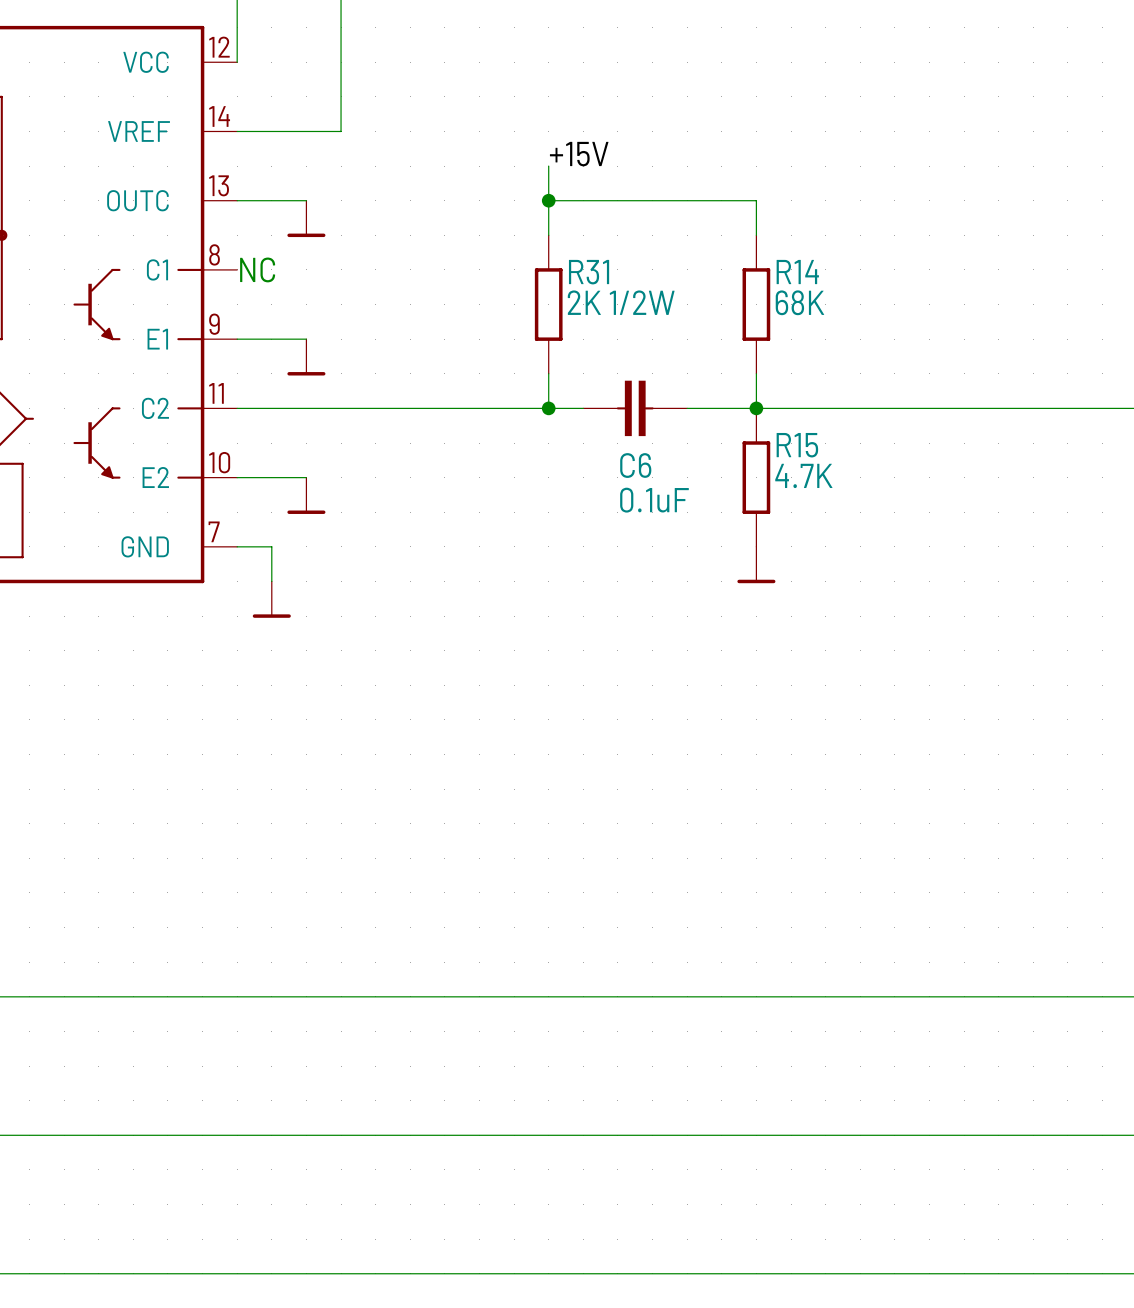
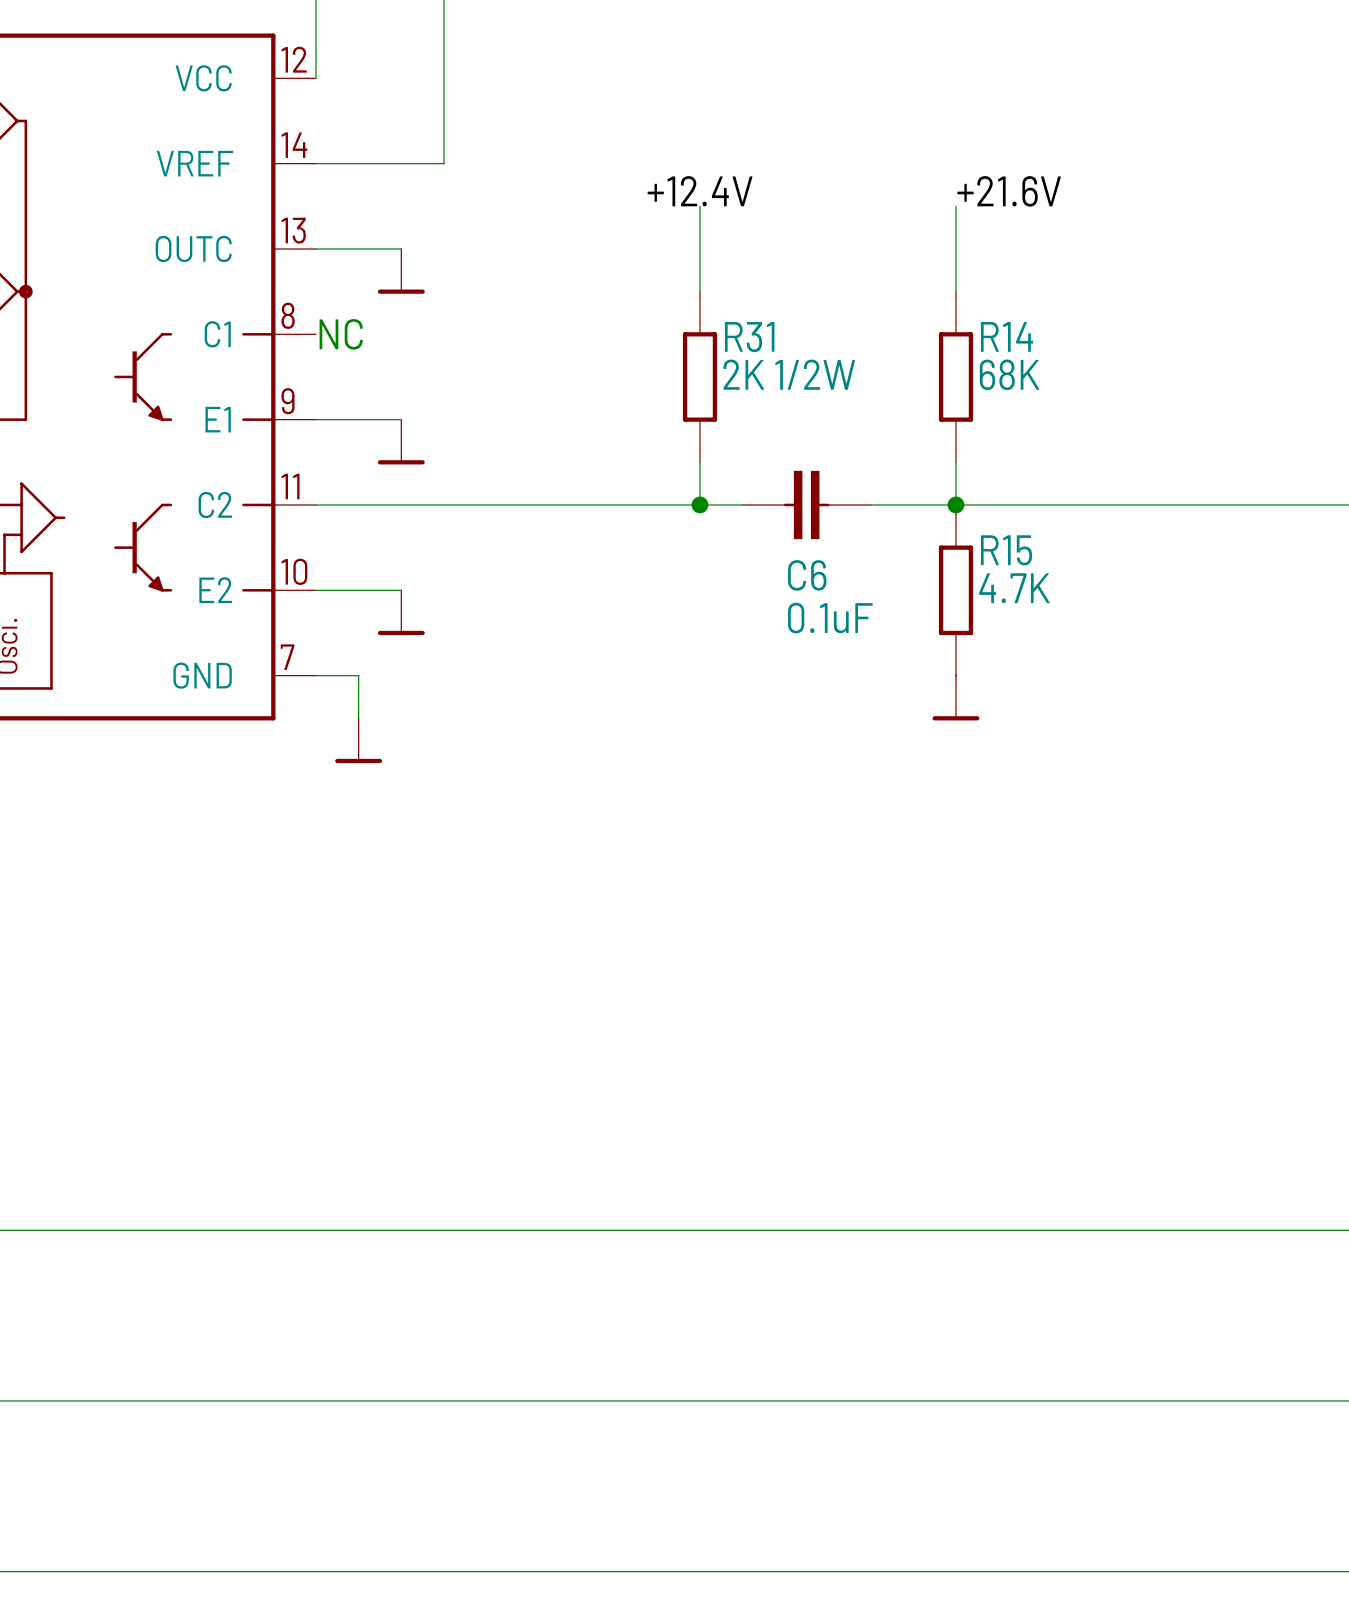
label: none -> +21.6V (1009, 191)
label: +15V (579, 154) -> +12.4V (700, 191)
wire: (548, 200) (756, 200) -> (955, 206) (955, 248)
junction: (548, 200) -> none

